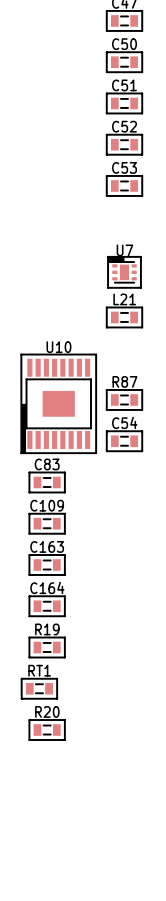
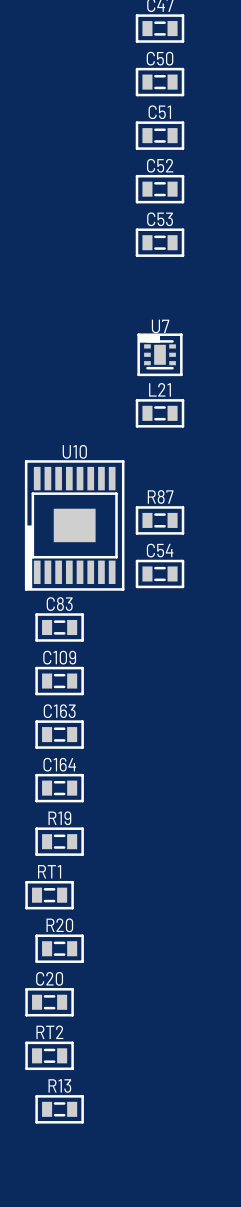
C20: none -> (49, 1002)
RT2: none -> (49, 1055)
R13: none -> (59, 1109)

